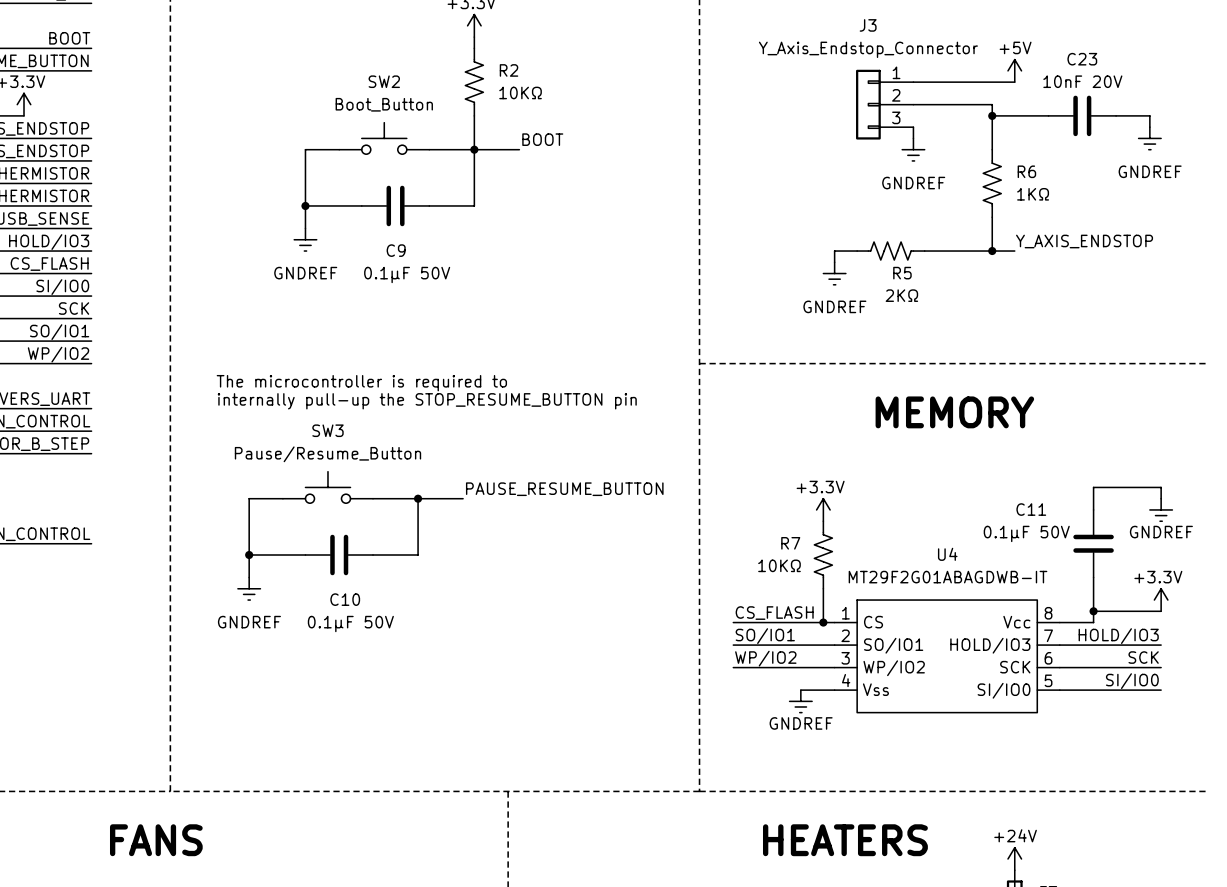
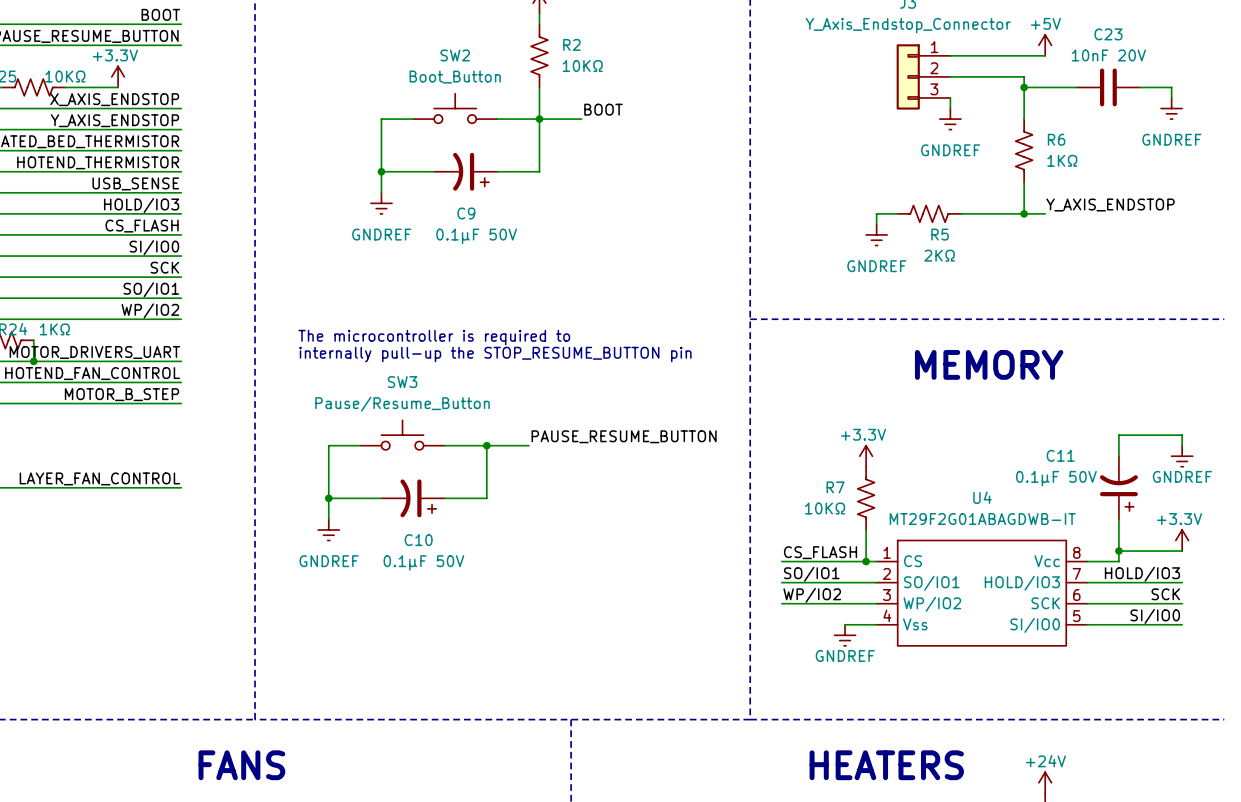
C9 symbol: [361, 185, 430, 227] -> [434, 152, 498, 191]
C11 symbol: [1073, 509, 1114, 578] -> [1099, 456, 1138, 520]
C10 symbol: [305, 534, 374, 576] -> [381, 479, 445, 518]

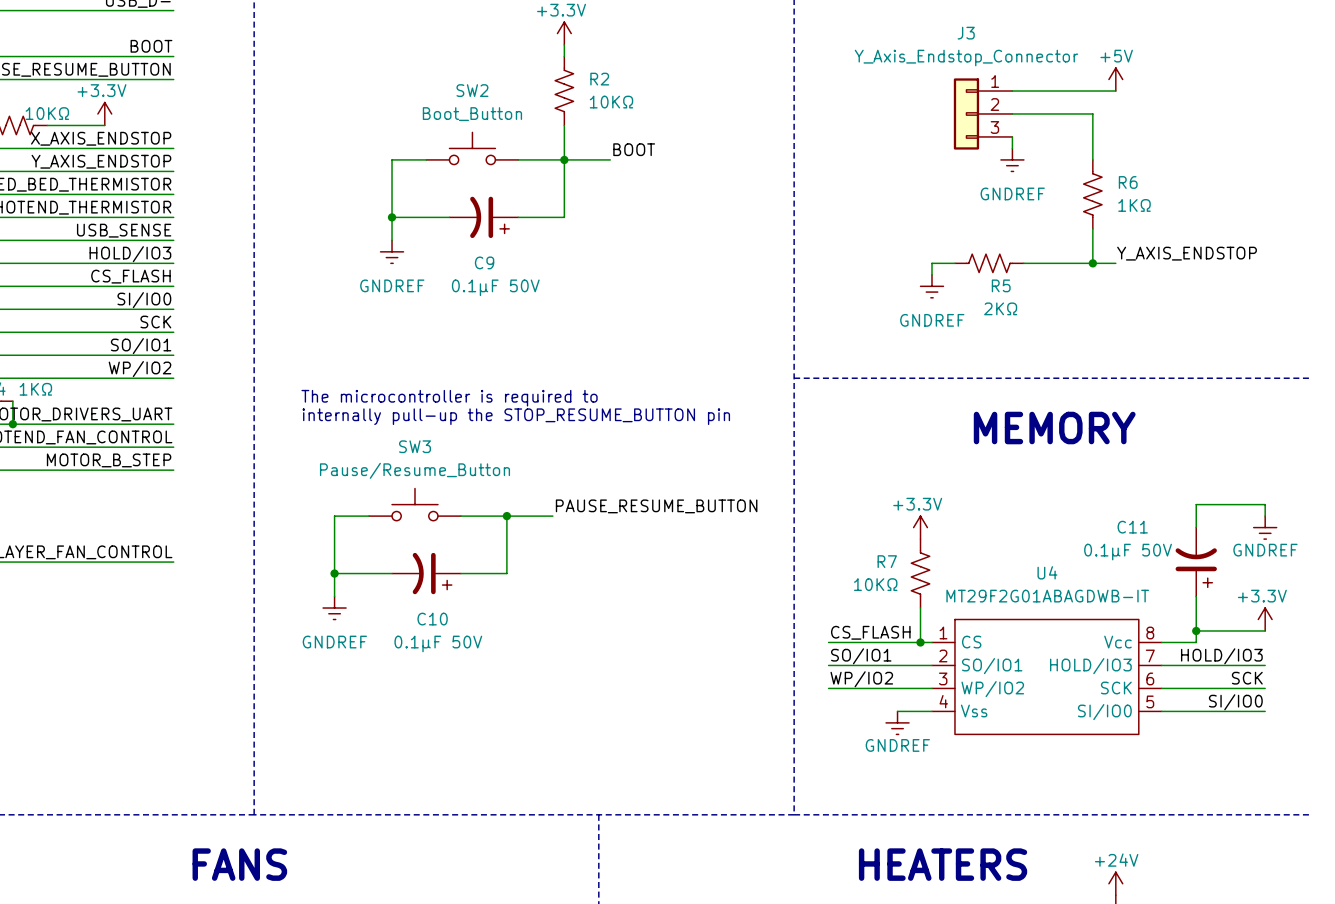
wire: (1024, 87) (1076, 87) -> none
junction: (1024, 87) -> none
C23: 10nF 20V (1108, 87) -> none
wire: (1140, 87) (1171, 87) (1171, 98) -> none
power symbol: GNDREF (1171, 108) -> none

